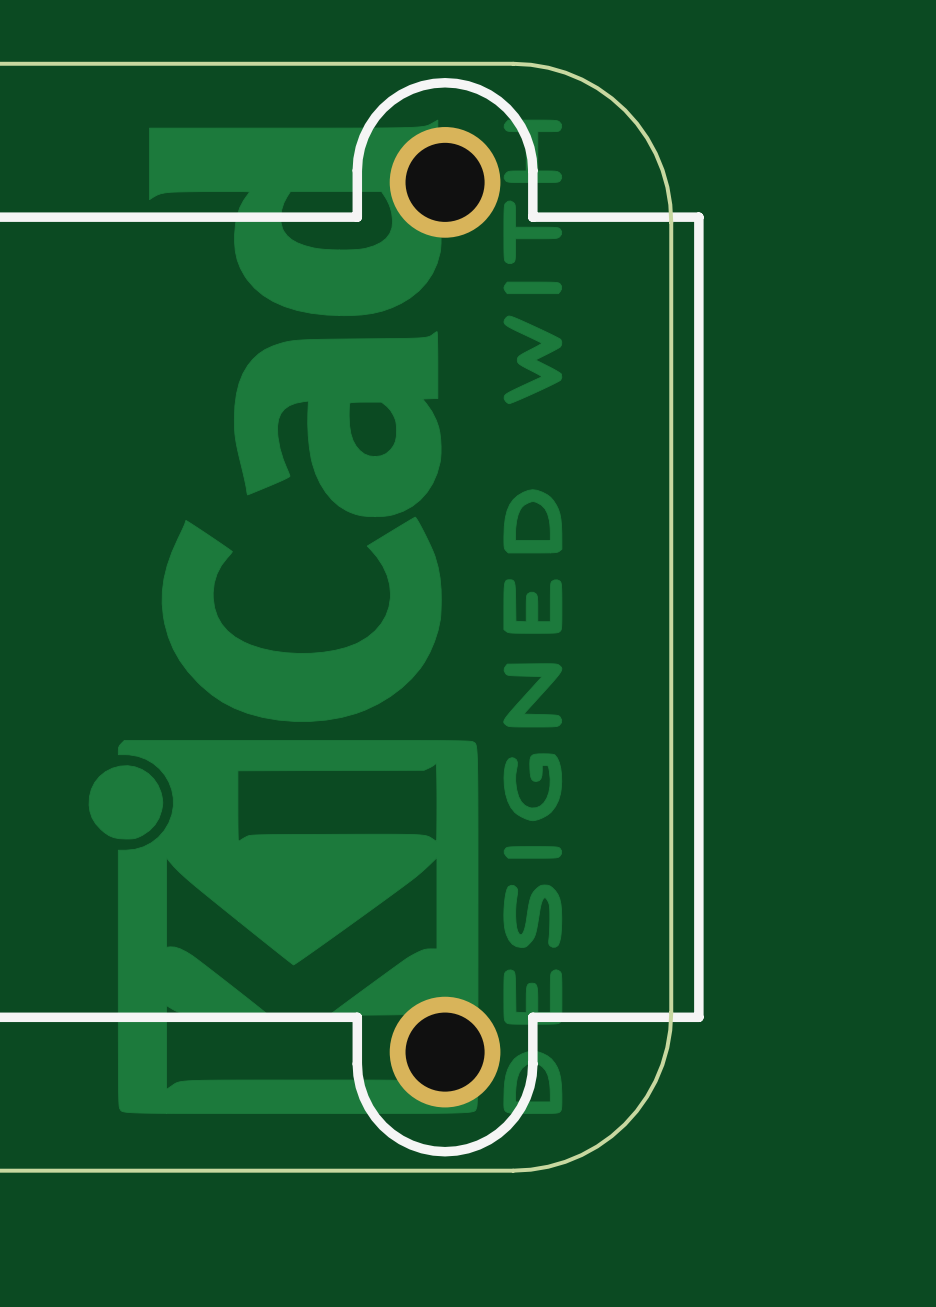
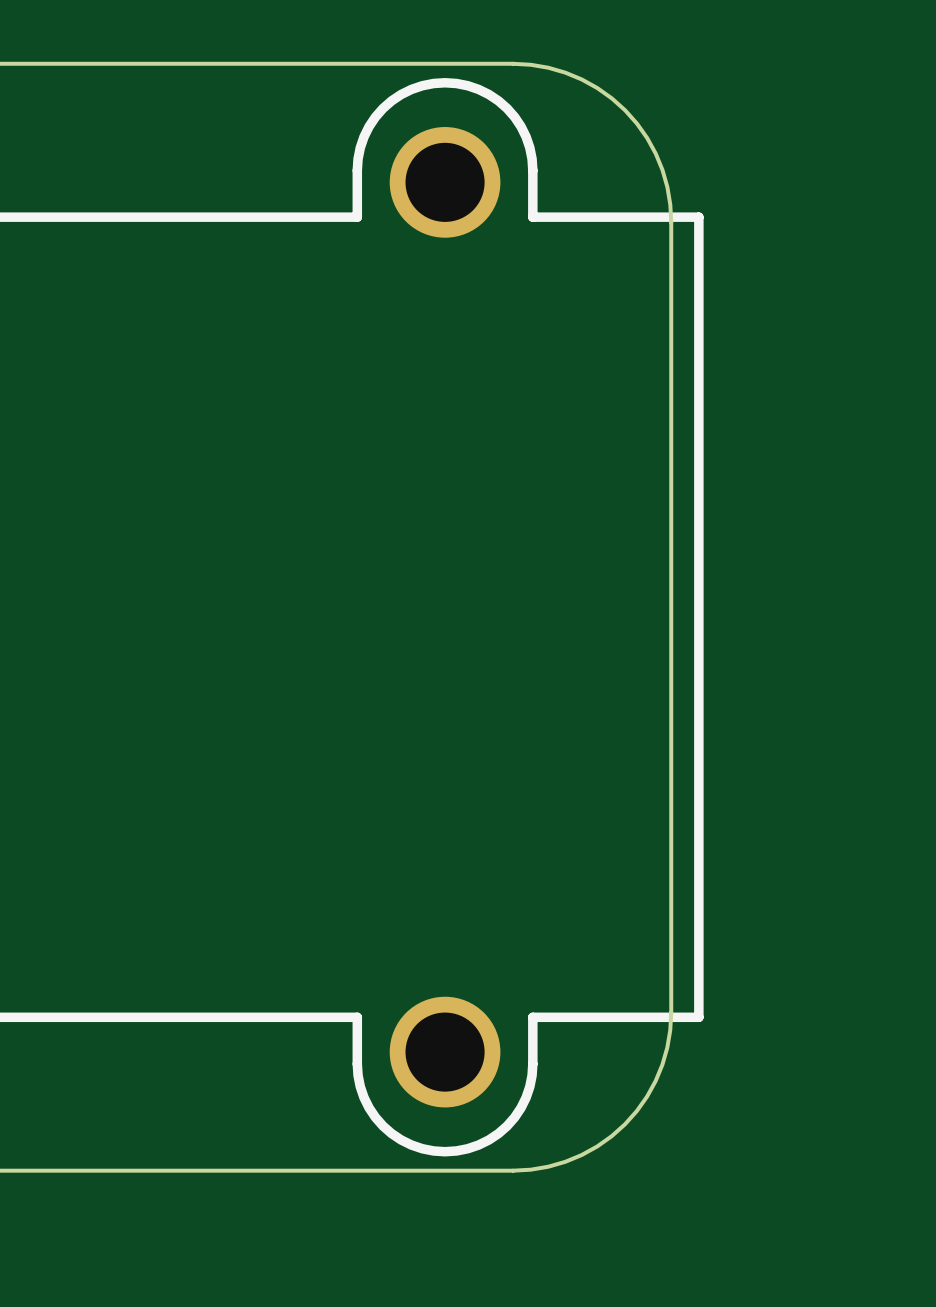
drawing: [88, 119, 563, 1114] -> none

